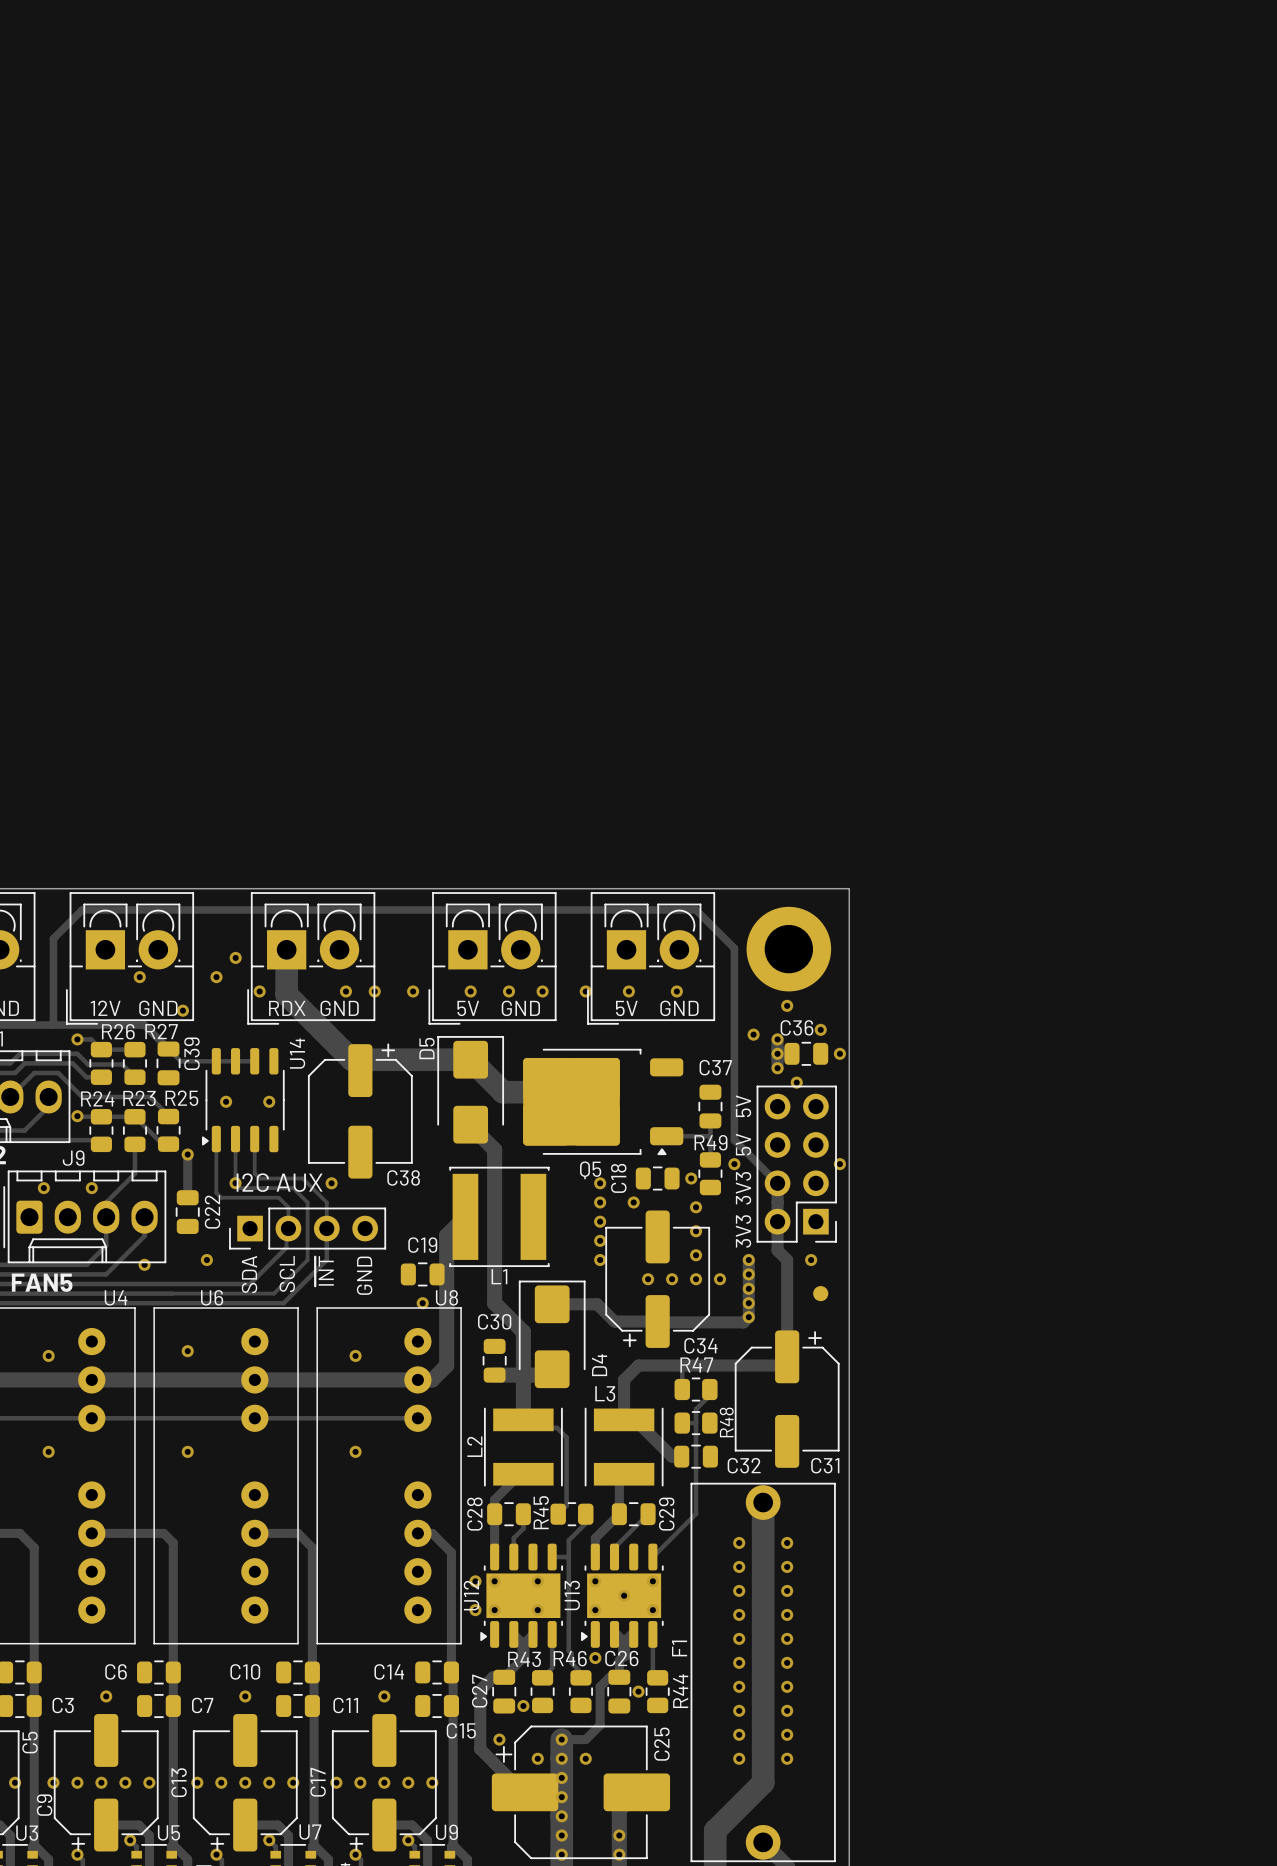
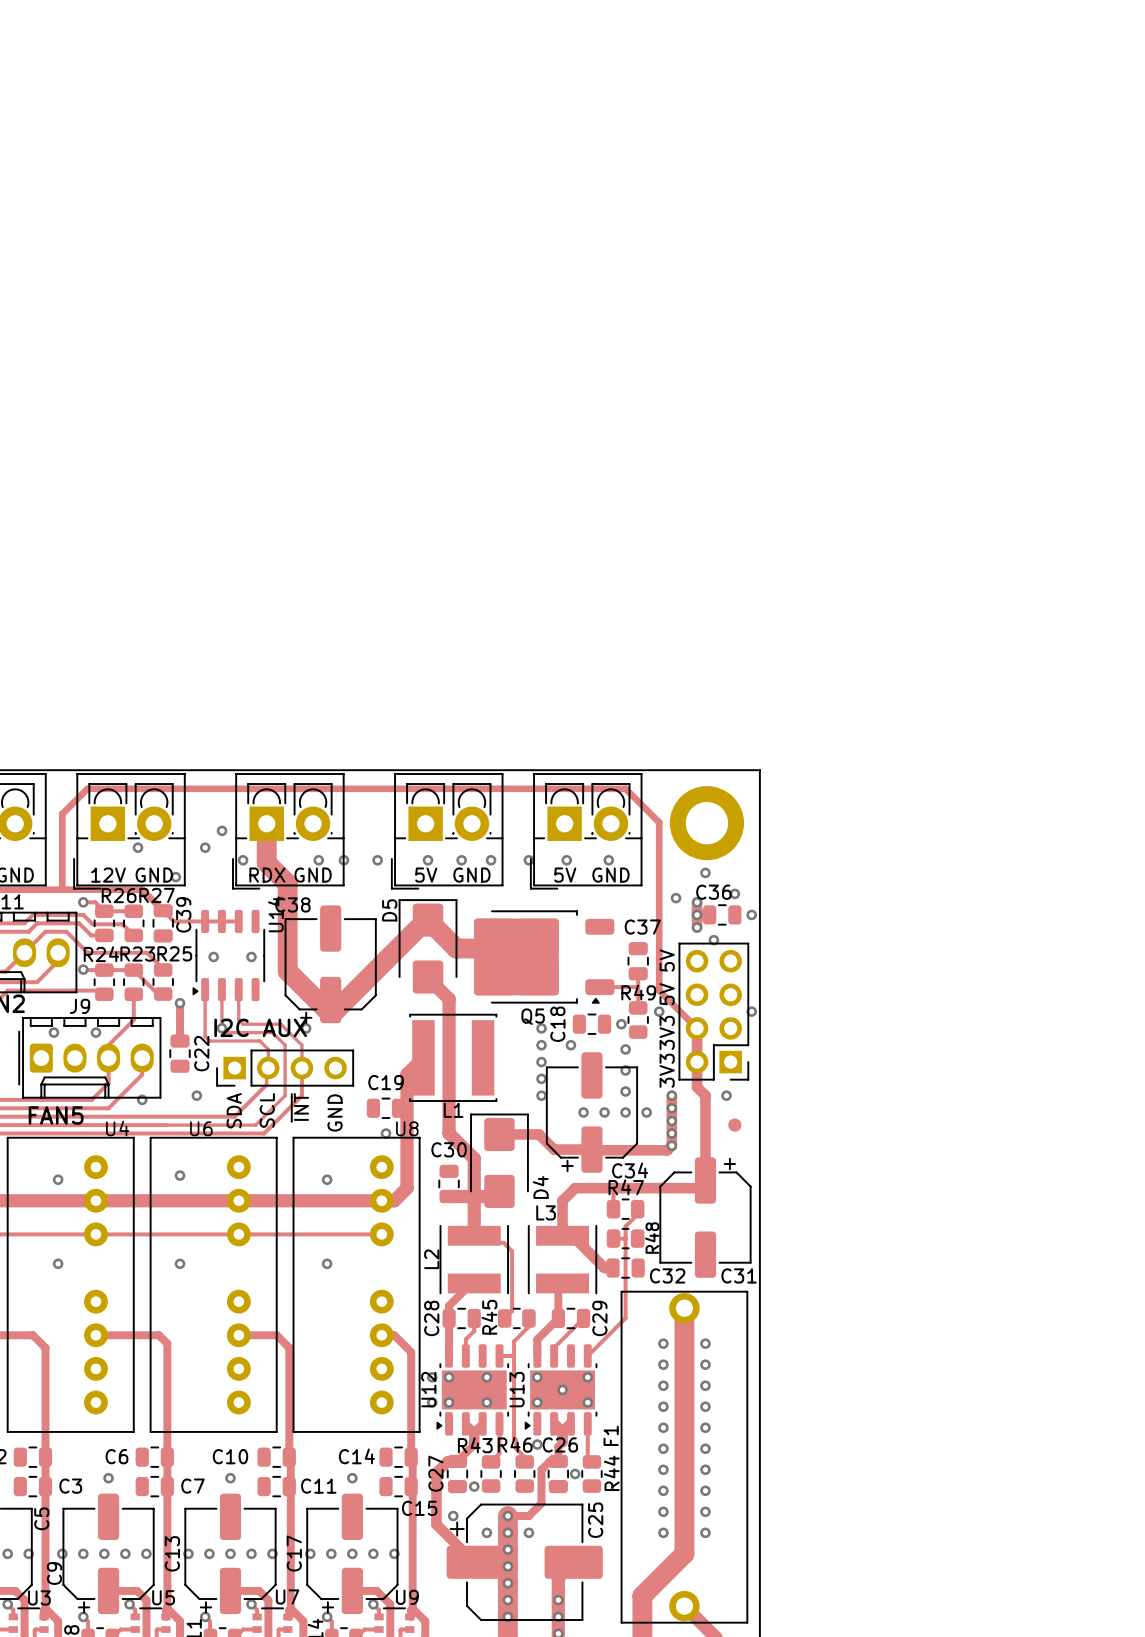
track: (310, 1018) (351, 1059) (468, 1059) -> (287, 883) (287, 971) (327, 1010) (335, 1010) (426, 920)
C38 footprint: [307, 1043, 413, 1179] -> [284, 905, 377, 1024]
C38 name position: C38 (403, 1177) -> C38 (292, 904)

